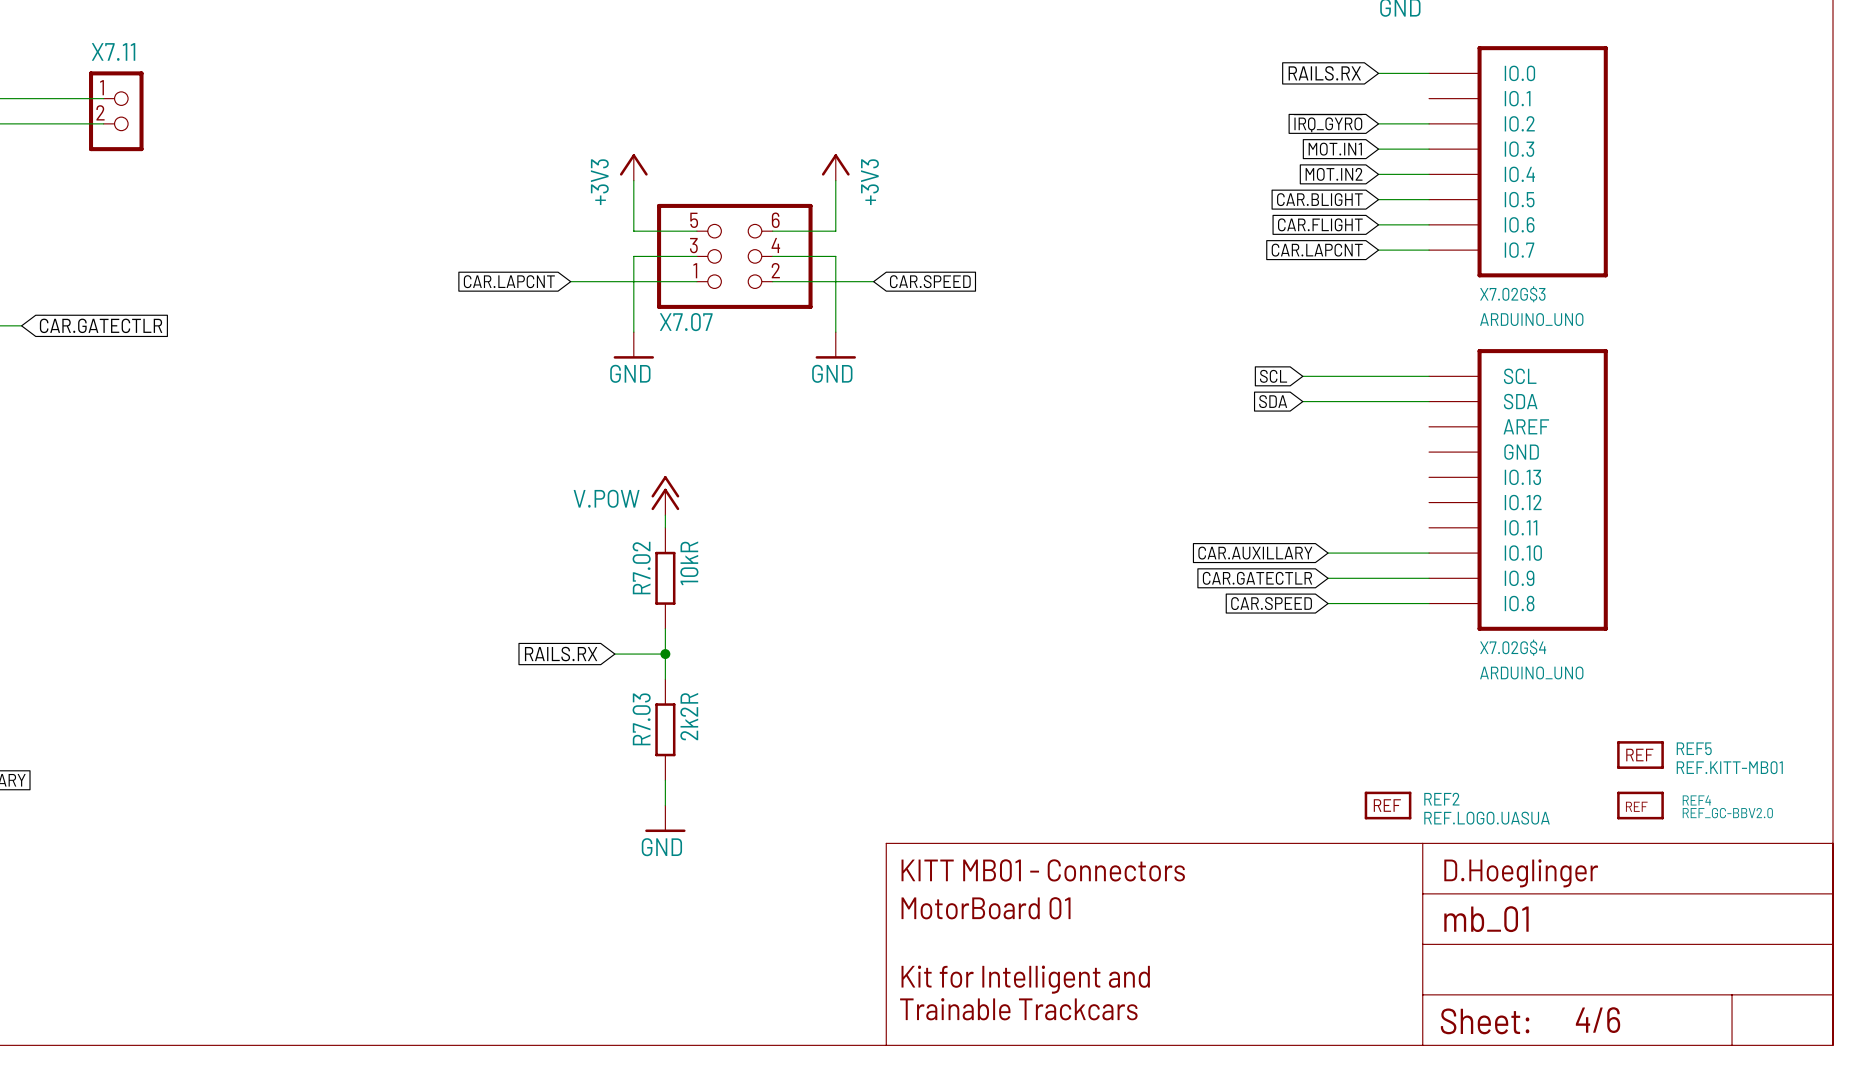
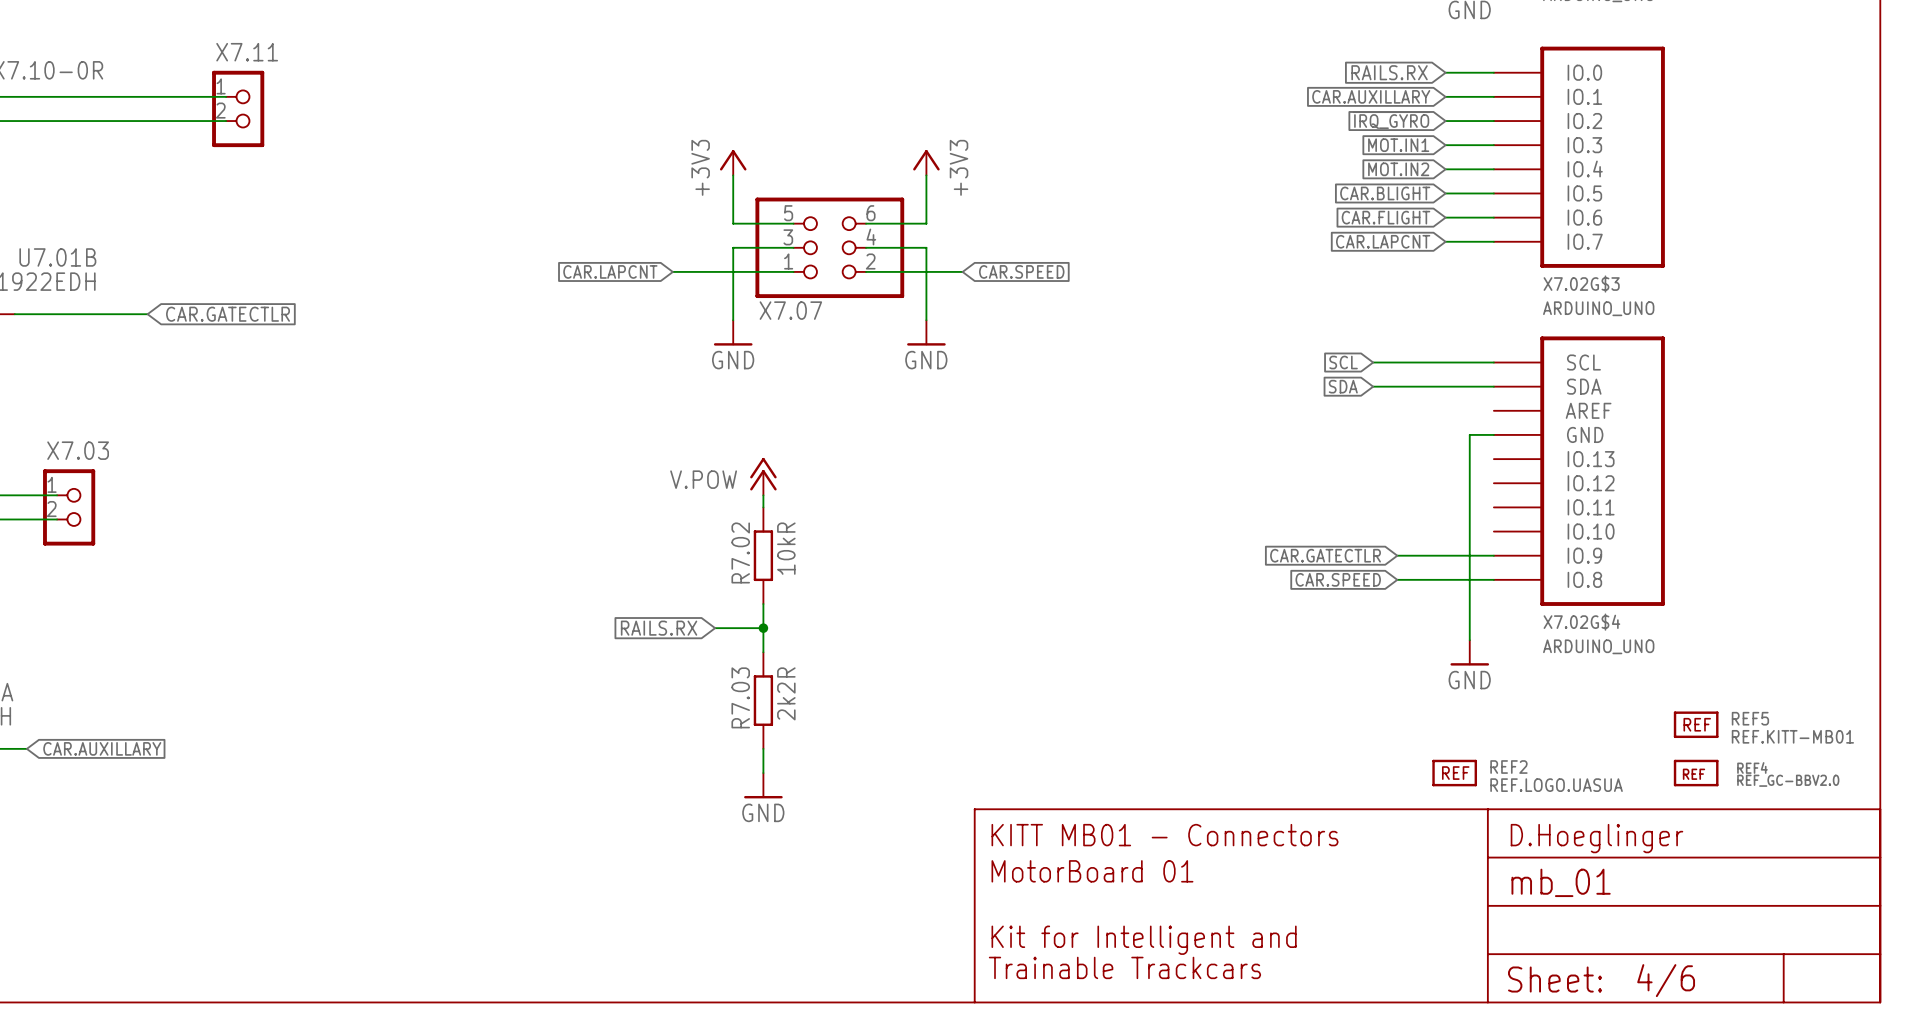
global label: none -> CAR.AUXILLARY (1371, 96)
wire: none -> (1445, 96) (1493, 96)
wire: none -> (1493, 434) (1469, 434) (1469, 640)
global label: CAR.AUXILLARY (1255, 553) -> none
wire: (1328, 553) (1429, 553) -> none
power symbol: none -> GND (1469, 652)

